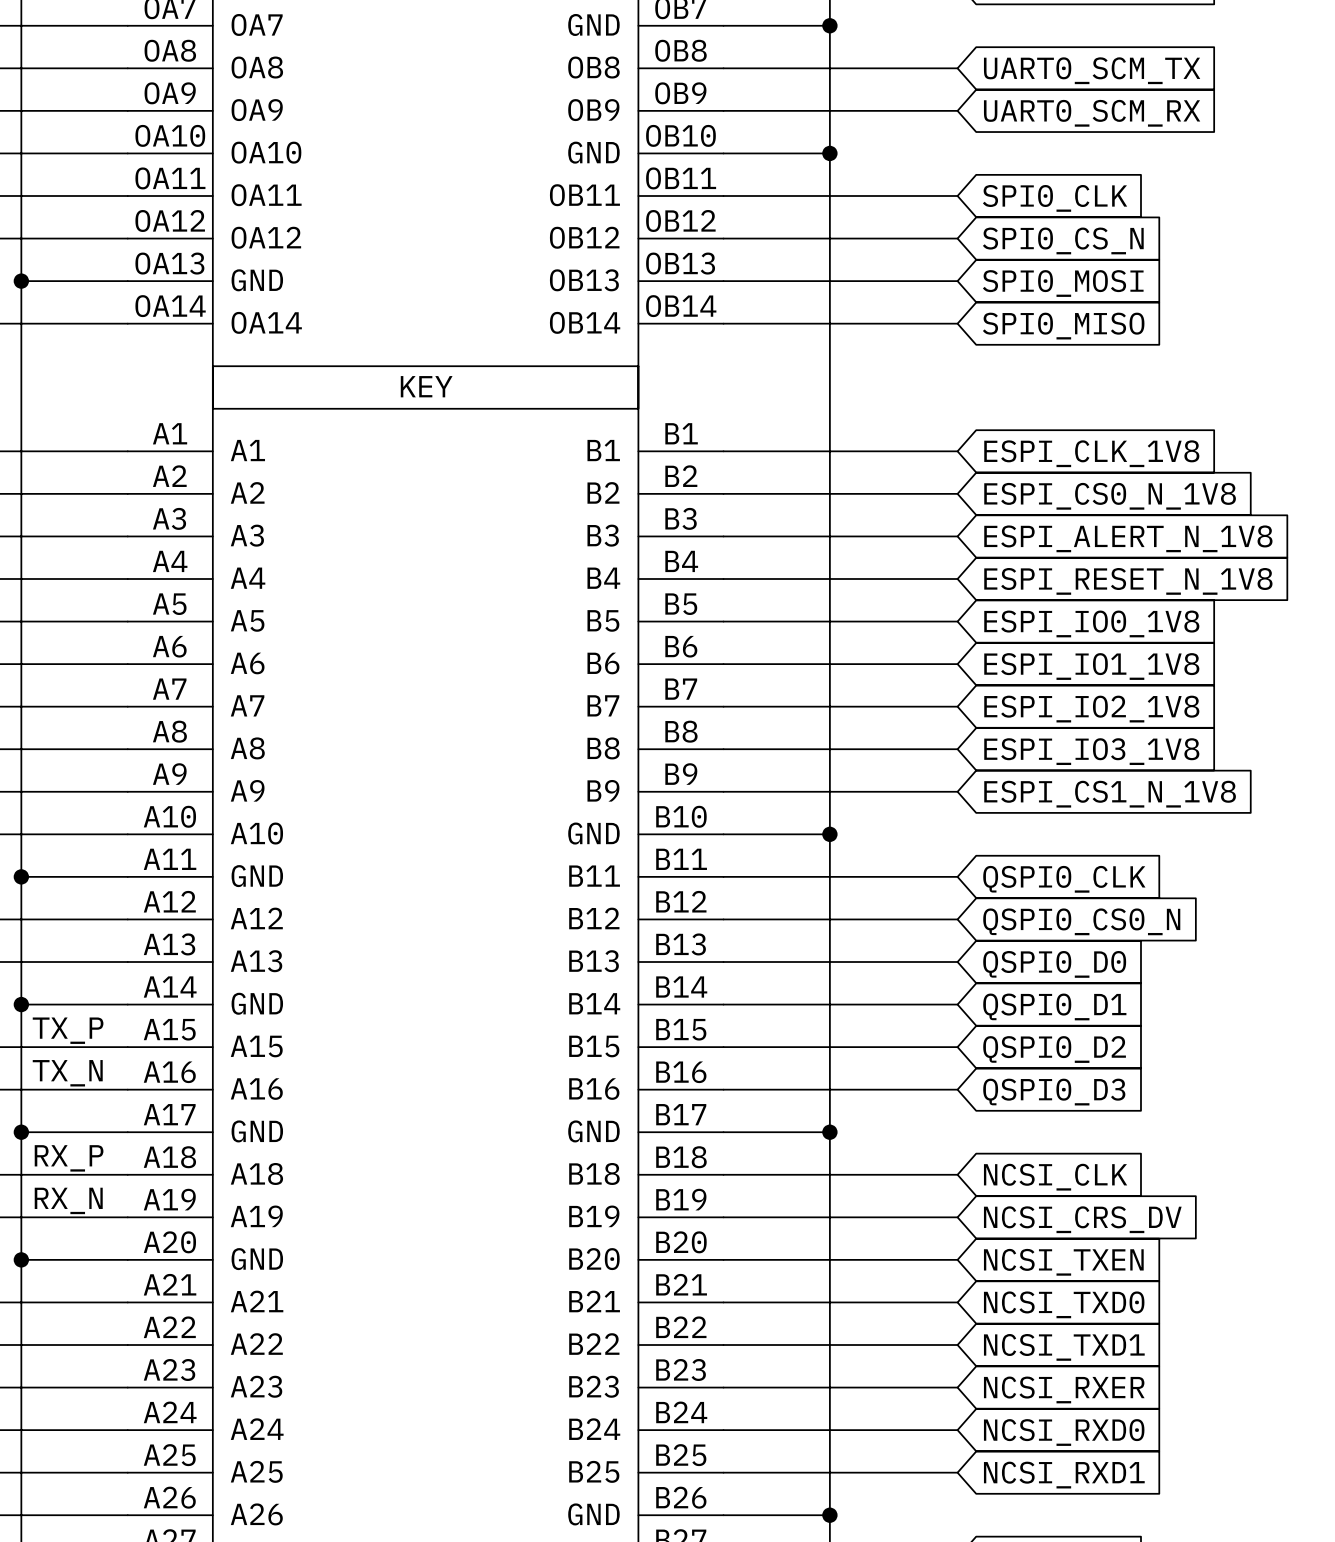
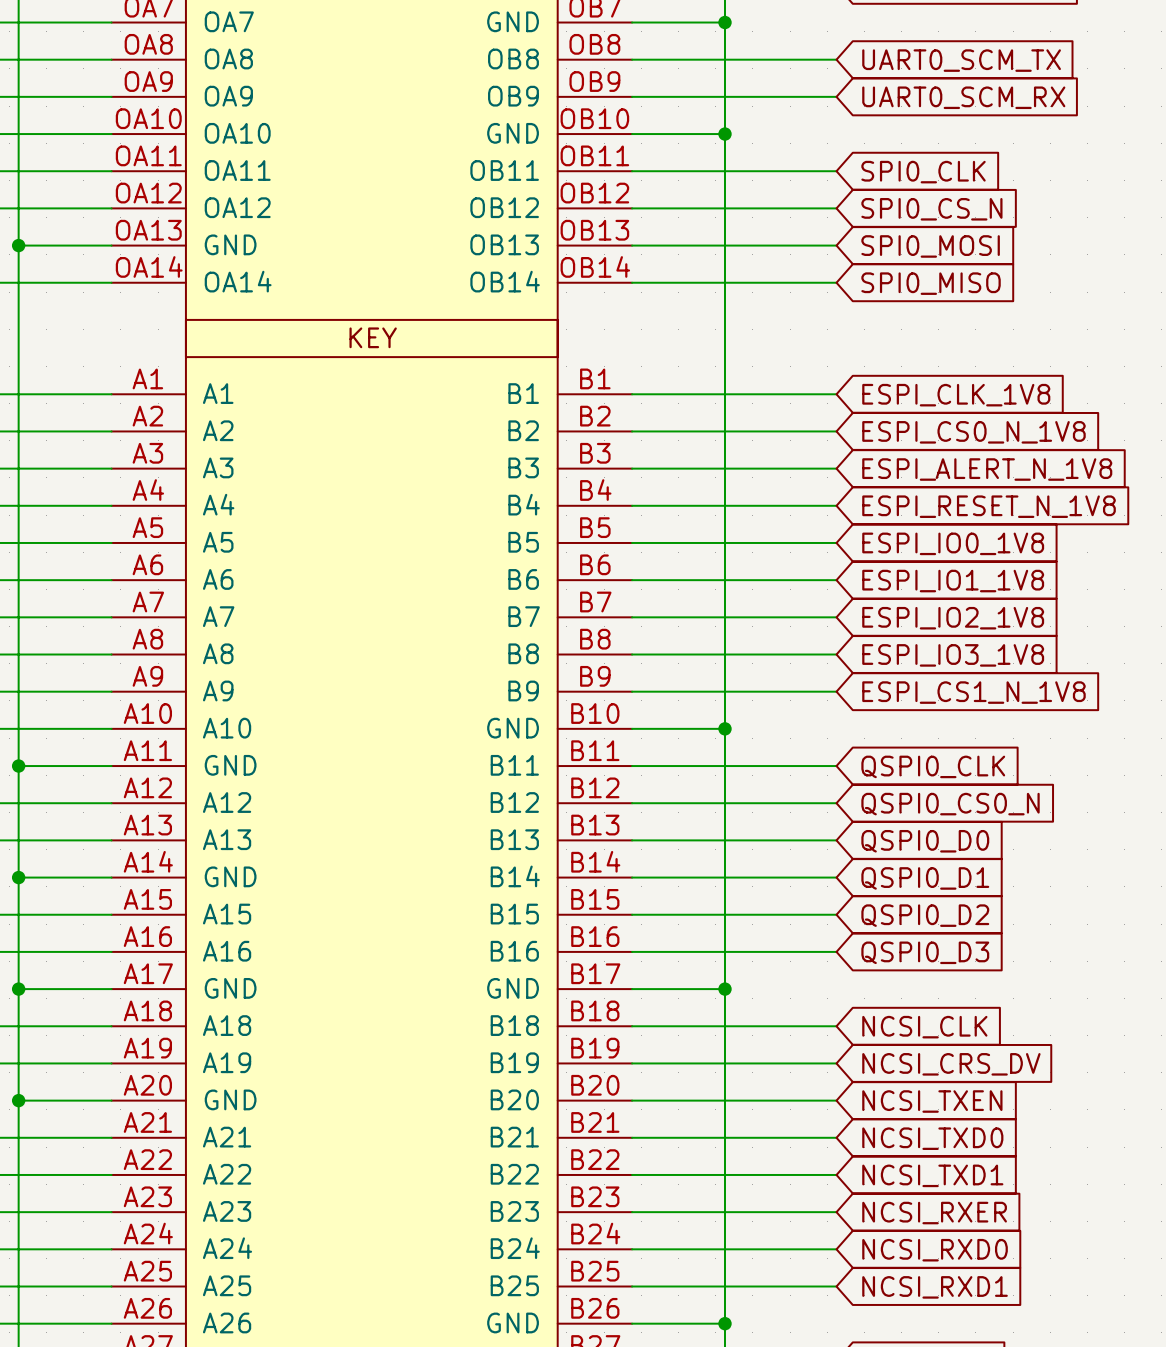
label: TX_P (68, 1030) -> none
label: TX_N (67, 1073) -> none
label: RX_P (69, 1158) -> none
label: RX_N (68, 1200) -> none

